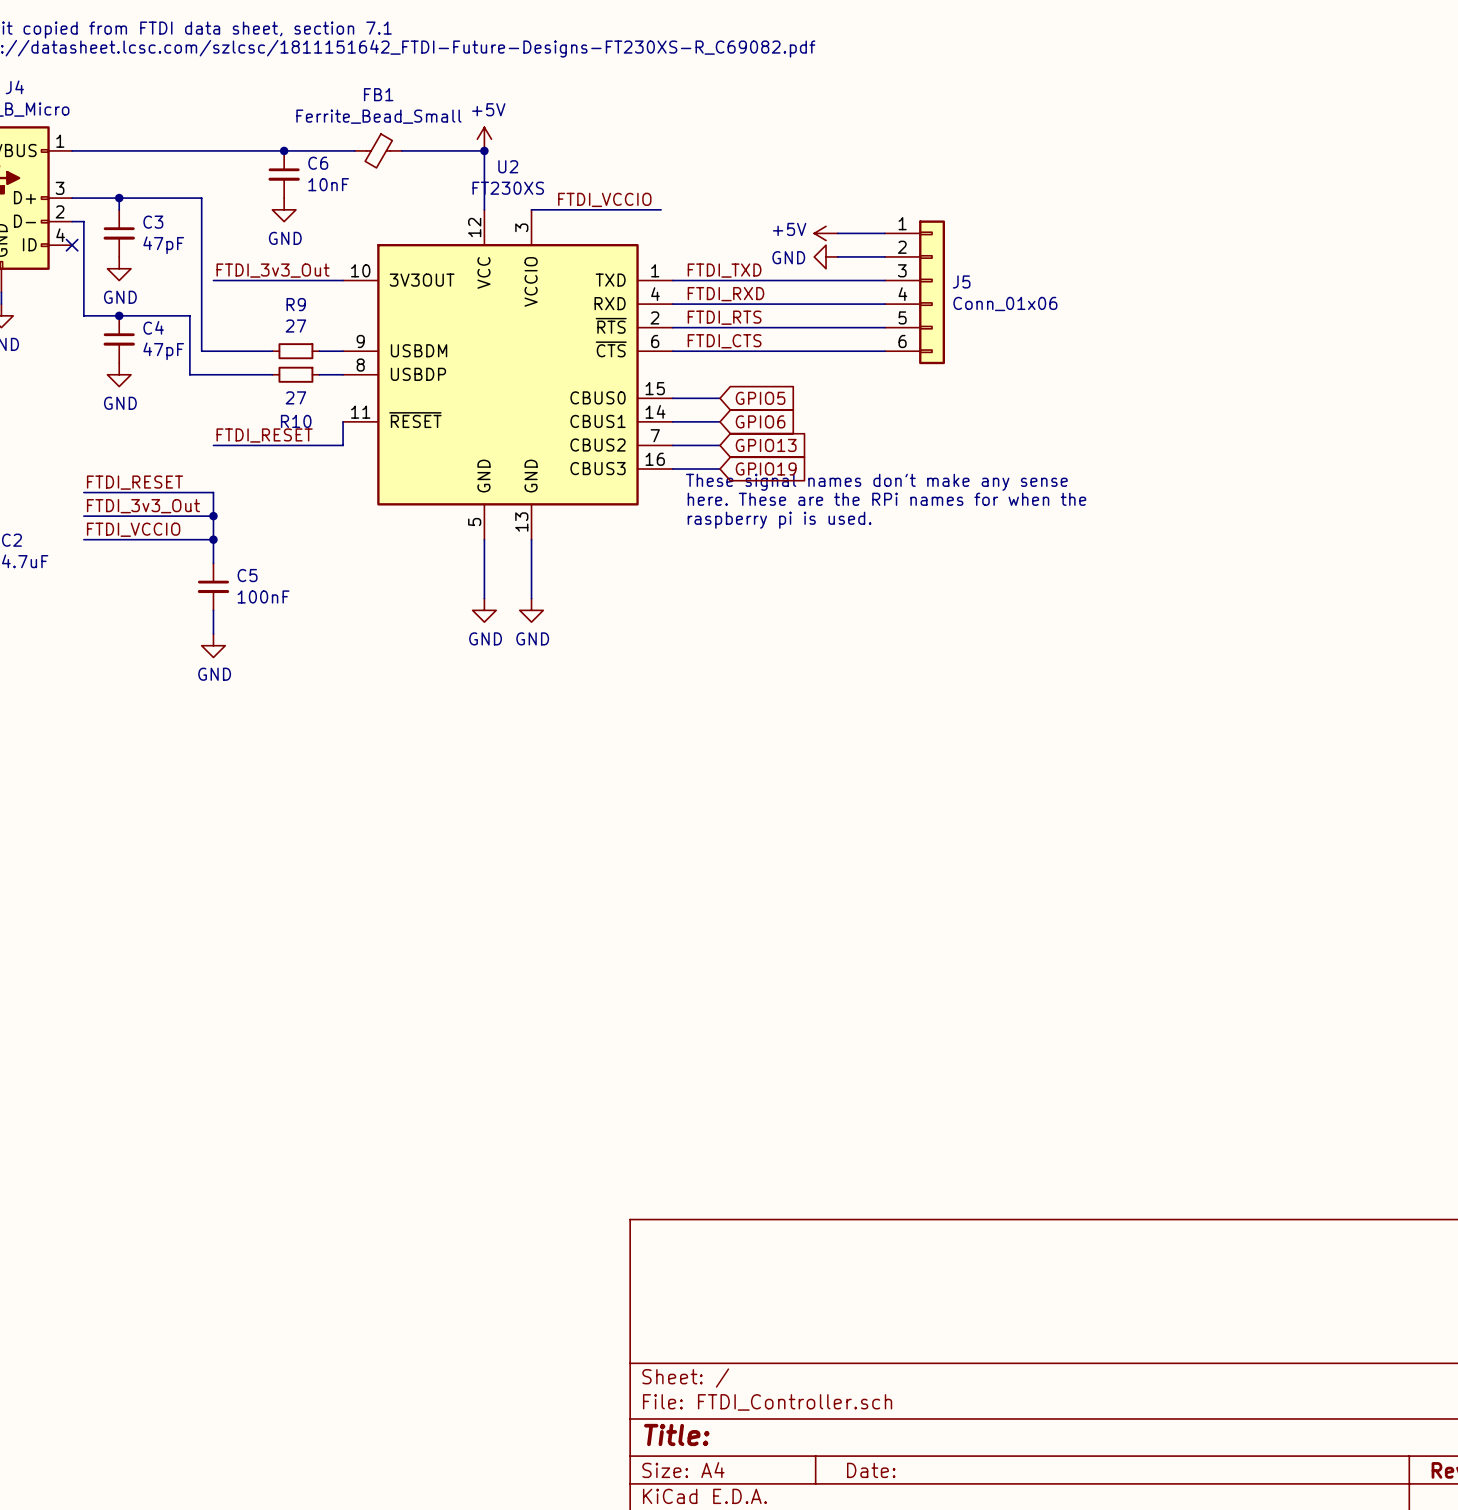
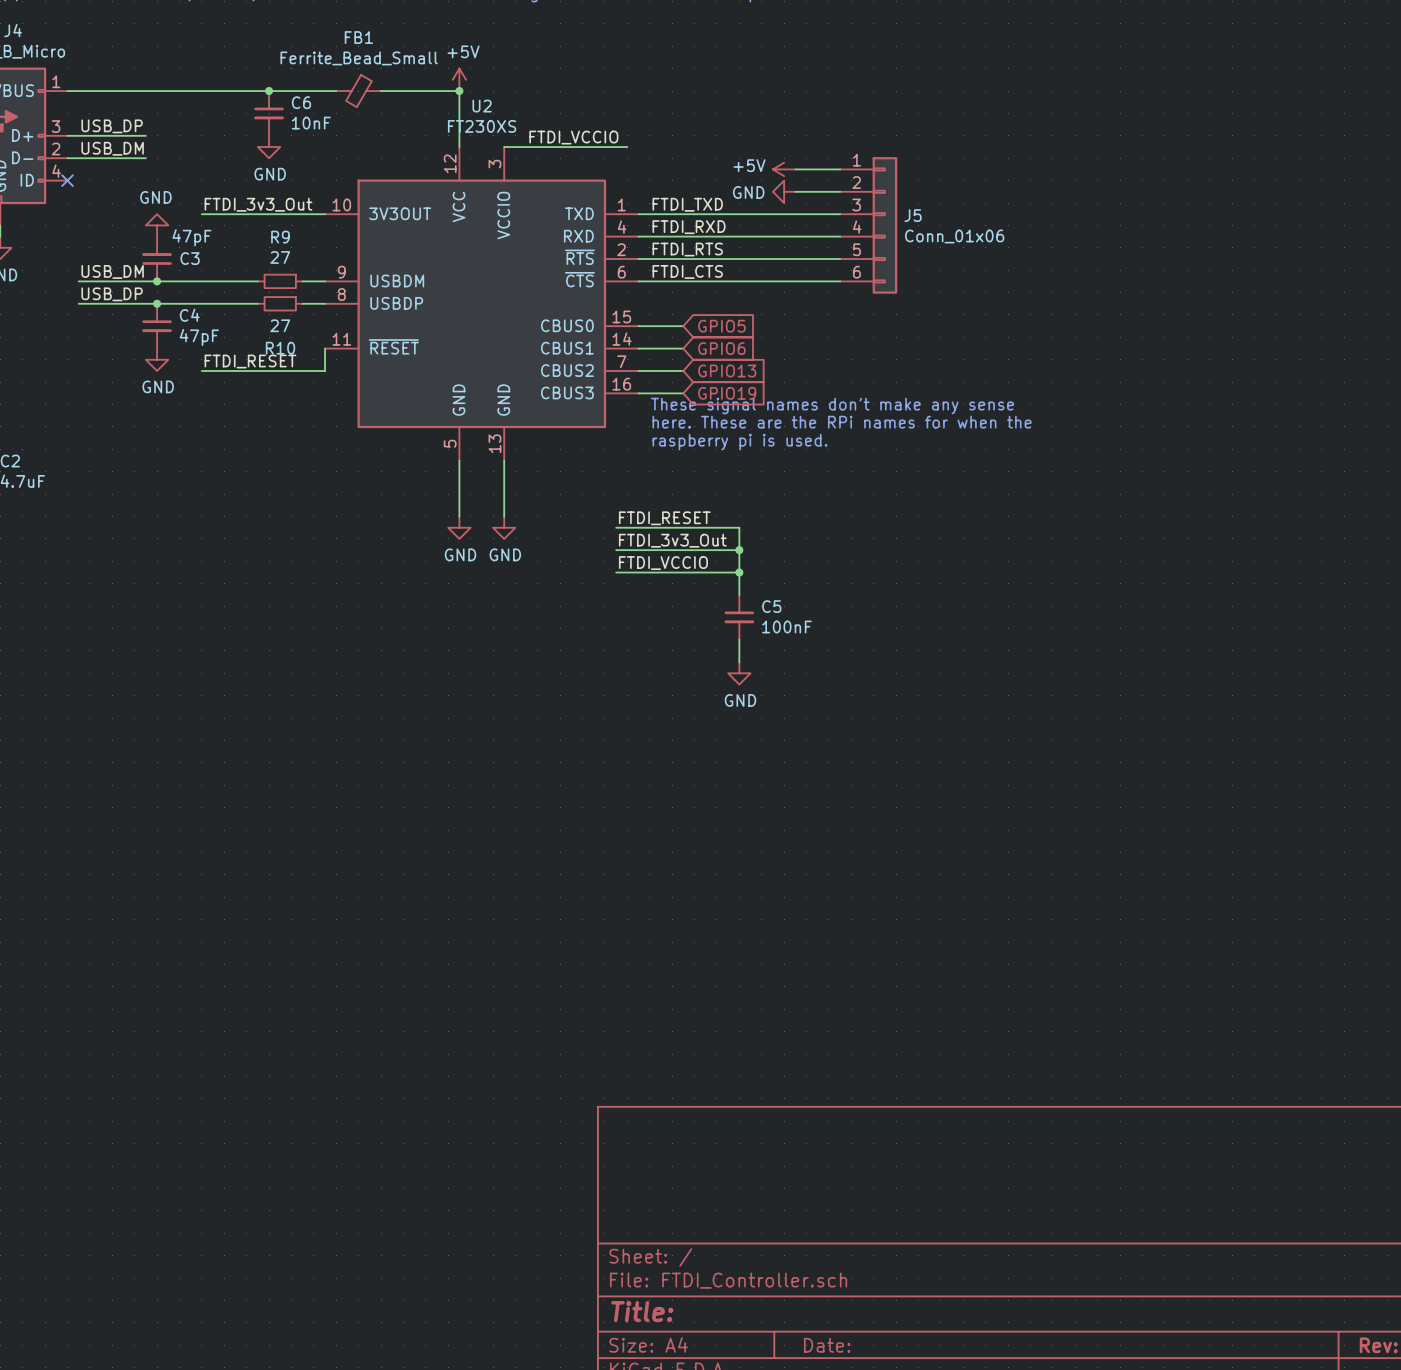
label: none -> USB_DP (112, 126)
wire: (119, 198) (119, 209) -> none
junction: (119, 198) -> none
wire: (154, 198) (201, 198) (201, 351) -> (78, 281) (190, 281)
label: none -> USB_DM (112, 148)
wire: (83, 221) (83, 315) (189, 315) (189, 374) -> (78, 303) (179, 303)
wire: none -> (78, 158) (145, 158)
C3 rotation: 0° (119, 233) -> 180° (157, 258)
C3 position: (119, 233) -> (157, 259)
C3 value position: 47pF (163, 245) -> 47pF (191, 237)
power symbol: GND (119, 268) -> none
power symbol: none -> GND (157, 225)
junction: (119, 315) -> none
C4 position: (119, 339) -> (157, 326)
label: none -> USB_DM (112, 271)
junction: none -> (157, 281)
label: none -> USB_DP (112, 294)
power symbol: GND (119, 374) -> none
junction: none -> (157, 303)
power symbol: none -> GND (157, 359)
label: FTDI_RESET (135, 482) -> none
wire: (83, 492) (213, 492) (213, 563) -> none
label: FTDI_3v3_Out (143, 506) -> none
wire: (83, 516) (213, 516) -> none
junction: (213, 516) -> none
label: FTDI_VCCIO (133, 529) -> none
wire: (83, 539) (213, 539) -> none
junction: (213, 539) -> none
C5 position: (213, 586) -> (739, 617)
label: none -> FTDI_RESET (664, 518)
wire: (213, 610) (213, 633) -> none
wire: none -> (616, 527) (739, 527) (739, 594)
label: none -> FTDI_3v3_Out (672, 540)
wire: none -> (616, 550) (739, 550)
junction: none -> (739, 550)
power symbol: GND (213, 645) -> none
label: none -> FTDI_VCCIO (663, 563)
wire: none -> (616, 572) (739, 572)
junction: none -> (739, 572)
wire: none -> (739, 639) (739, 662)
power symbol: none -> GND (739, 673)

